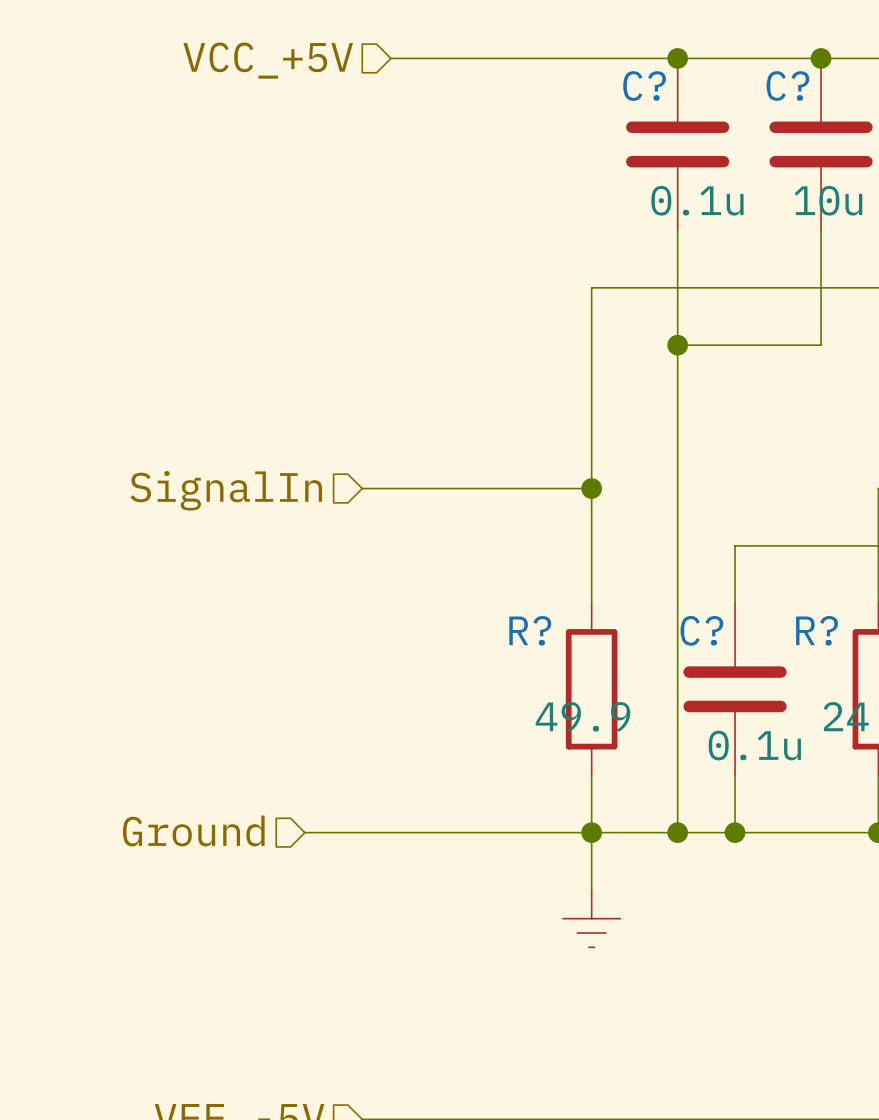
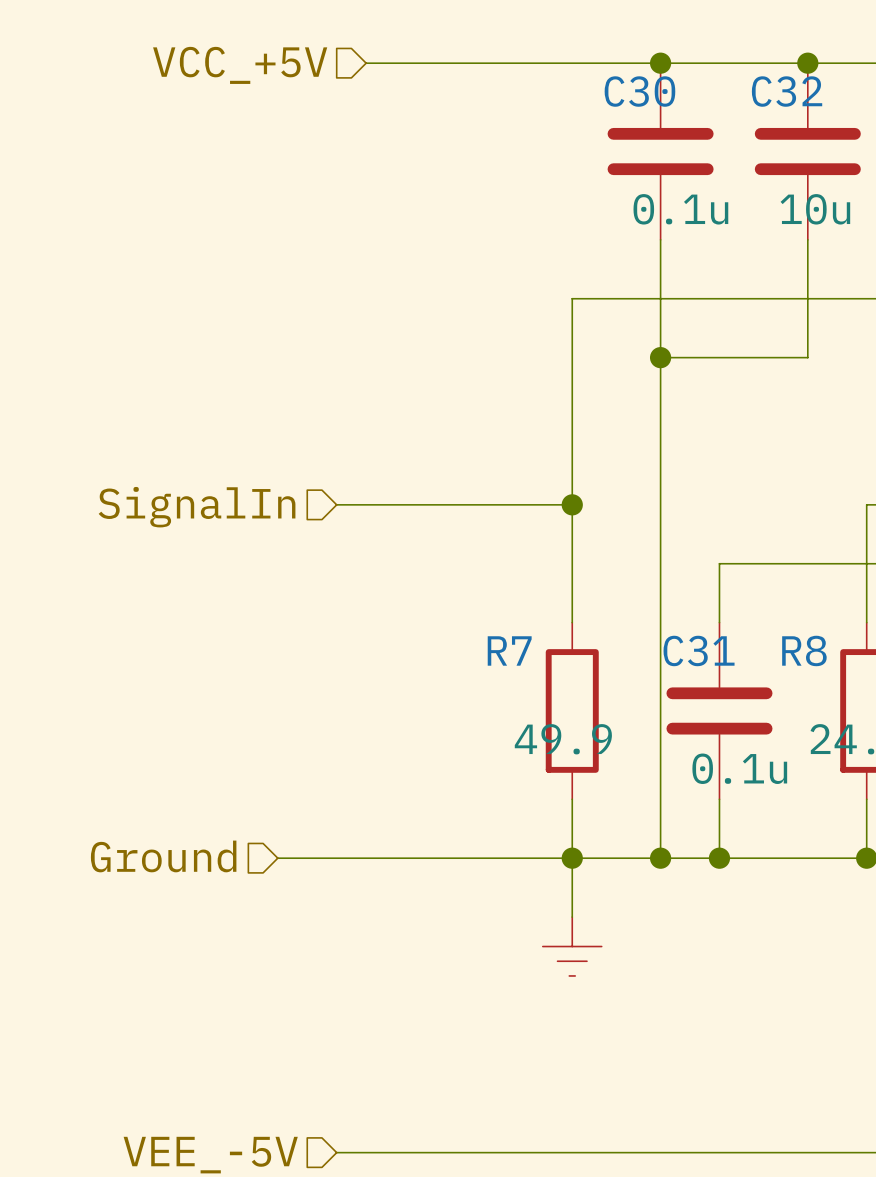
C? name: C? (644, 86) -> C30 (639, 91)
C? name: C? (787, 86) -> C32 (787, 91)
R? name: R? (530, 630) -> R7 (509, 650)
C? name: C? (701, 630) -> C31 (699, 650)
R? name: R? (817, 630) -> R8 (804, 650)

